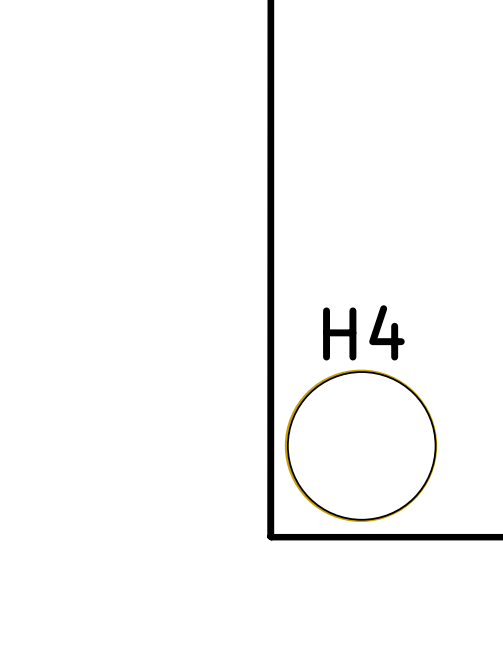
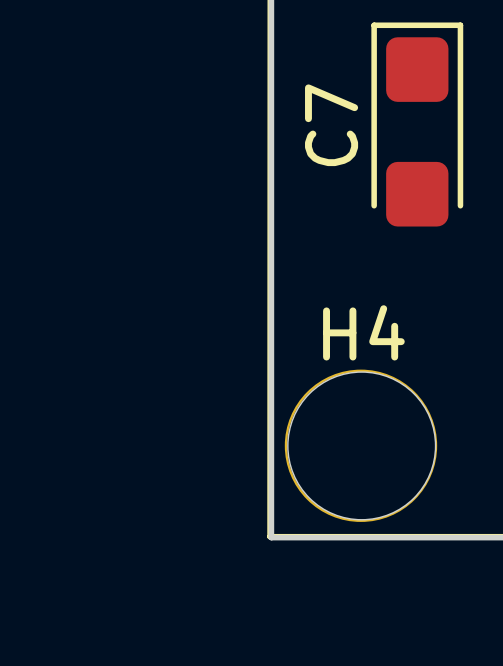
C7: none -> (417, 124)

